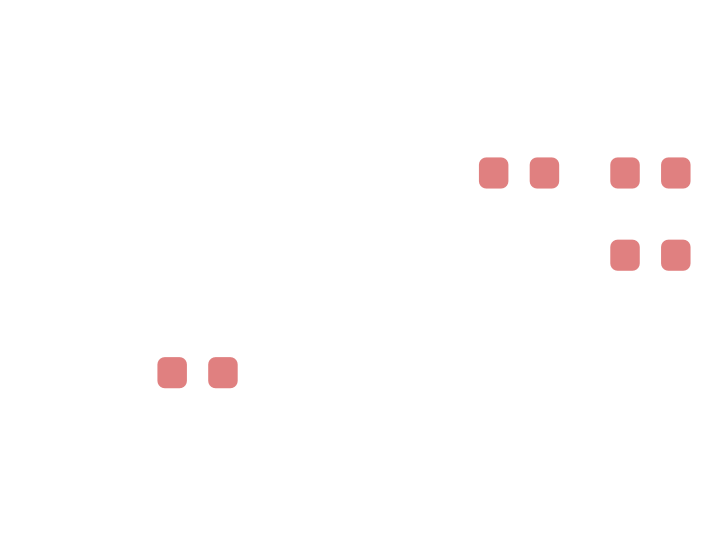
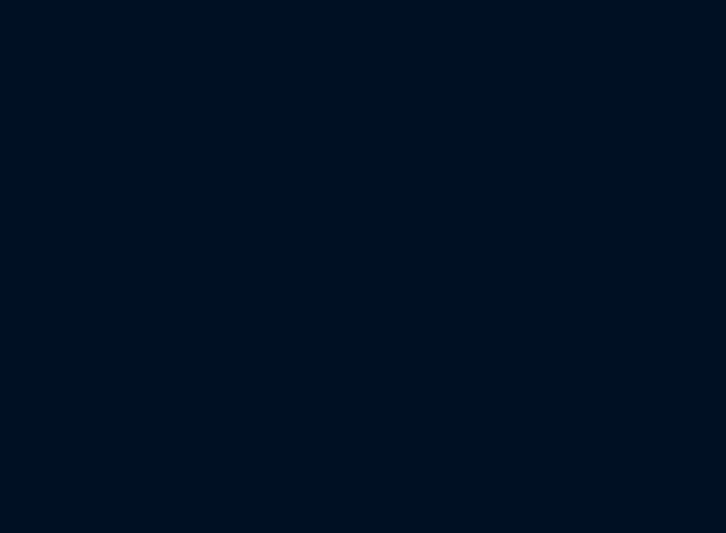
part: (519, 172) -> none
part: (650, 172) -> none
part: (650, 255) -> none
part: (197, 372) -> none

